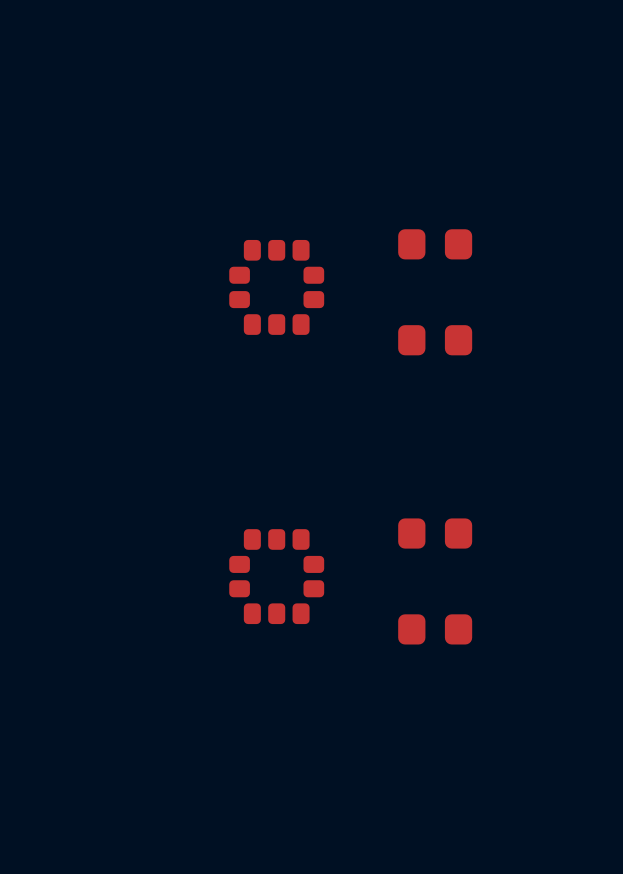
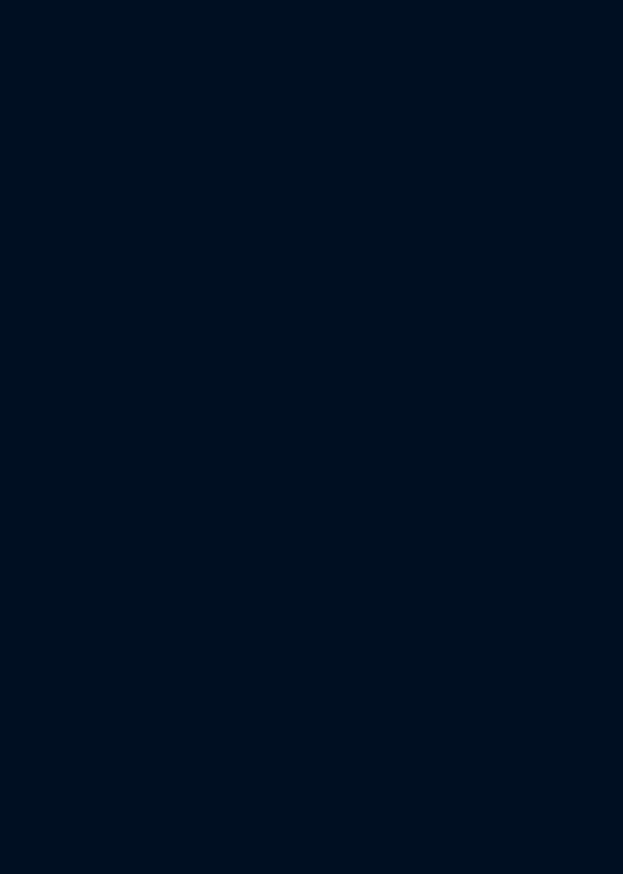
part: (435, 244) -> none
part: (276, 287) -> none
part: (435, 340) -> none
part: (435, 533) -> none
part: (276, 576) -> none
part: (435, 629) -> none

